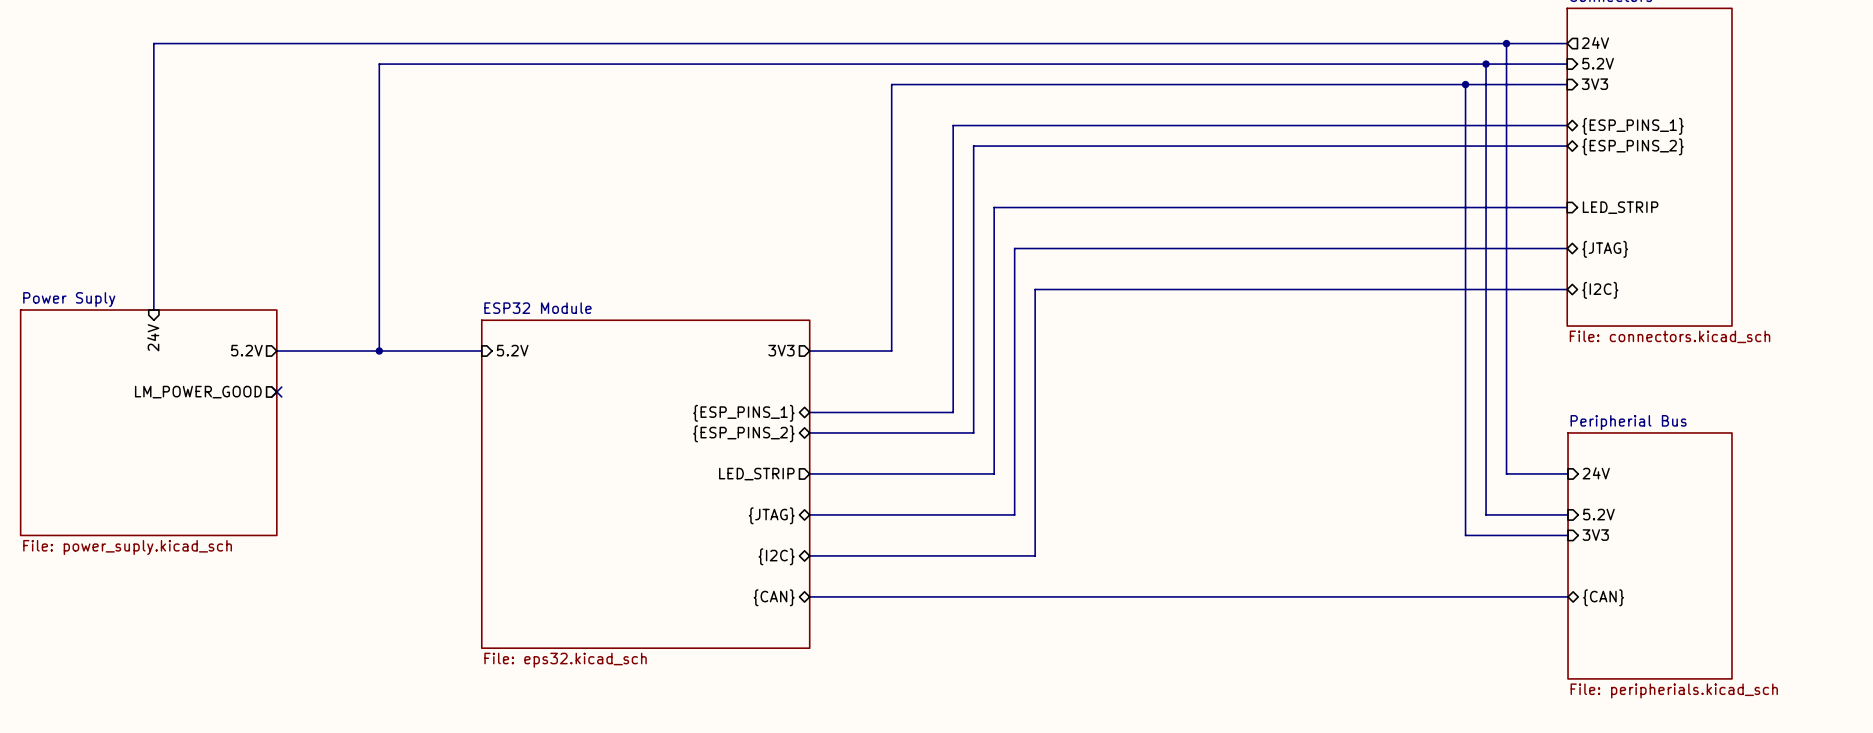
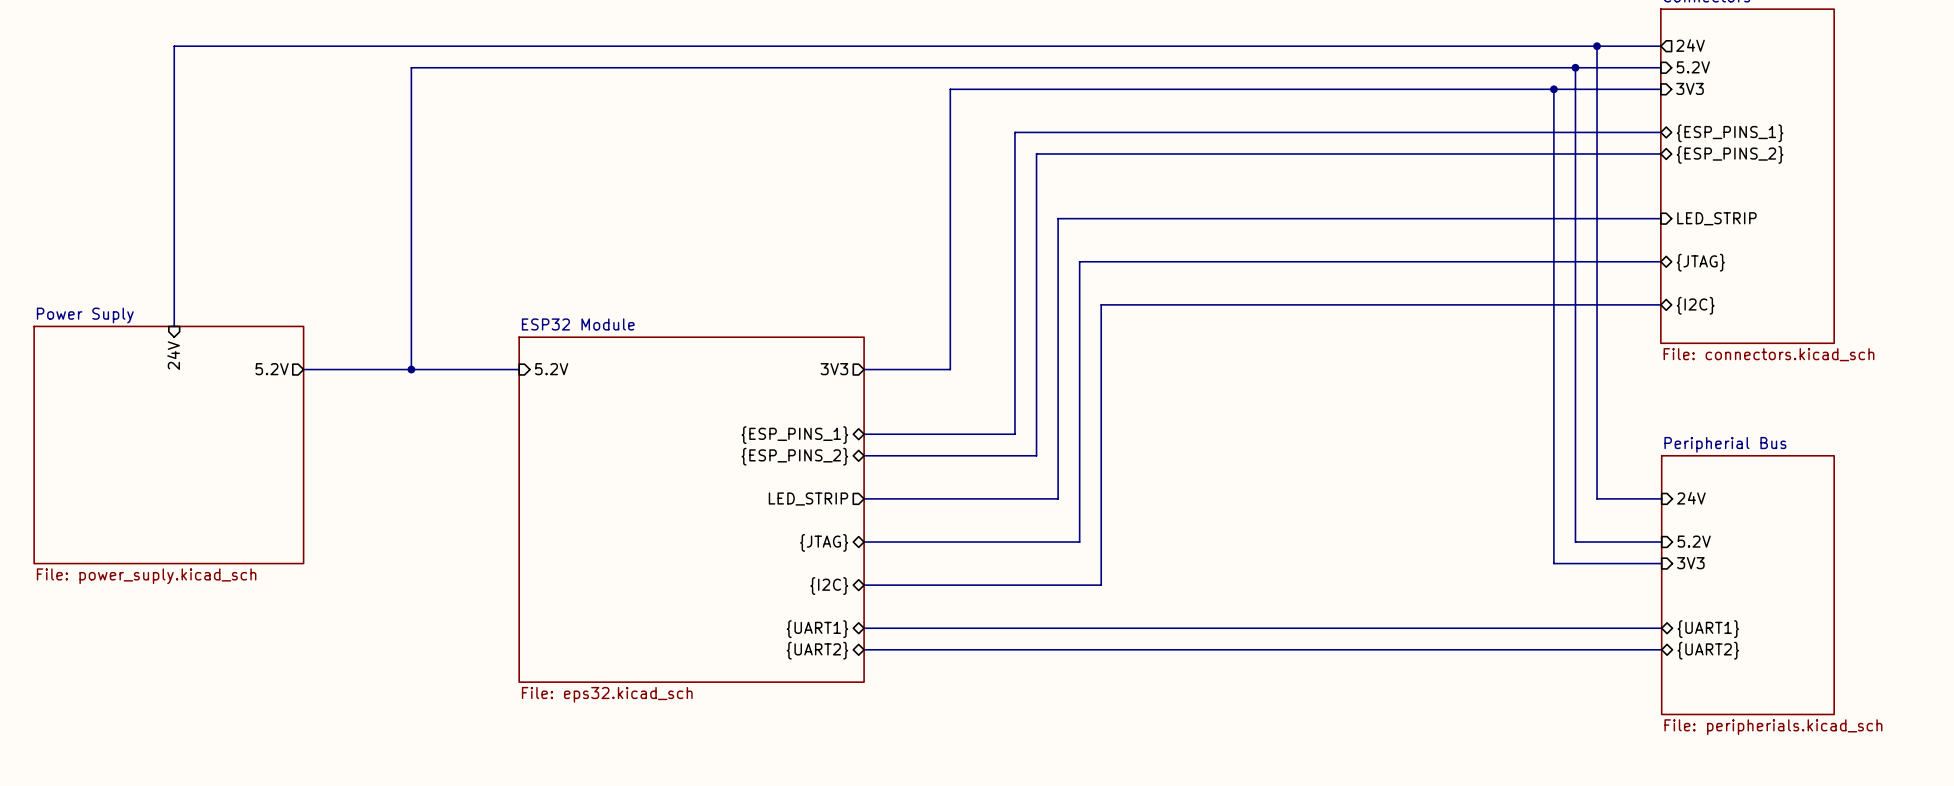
no-connect mark: (276, 391) -> none
sheet pin: LM_POWER_GOOD (198, 392) -> none
sheet pin: {CAN} (774, 597) -> {UART1} (817, 629)
sheet pin: {CAN} (1603, 597) -> {UART1} (1708, 629)
bus: none -> (864, 649) (1661, 649)
sheet pin: none -> {UART2} (817, 650)
sheet pin: none -> {UART2} (1708, 650)

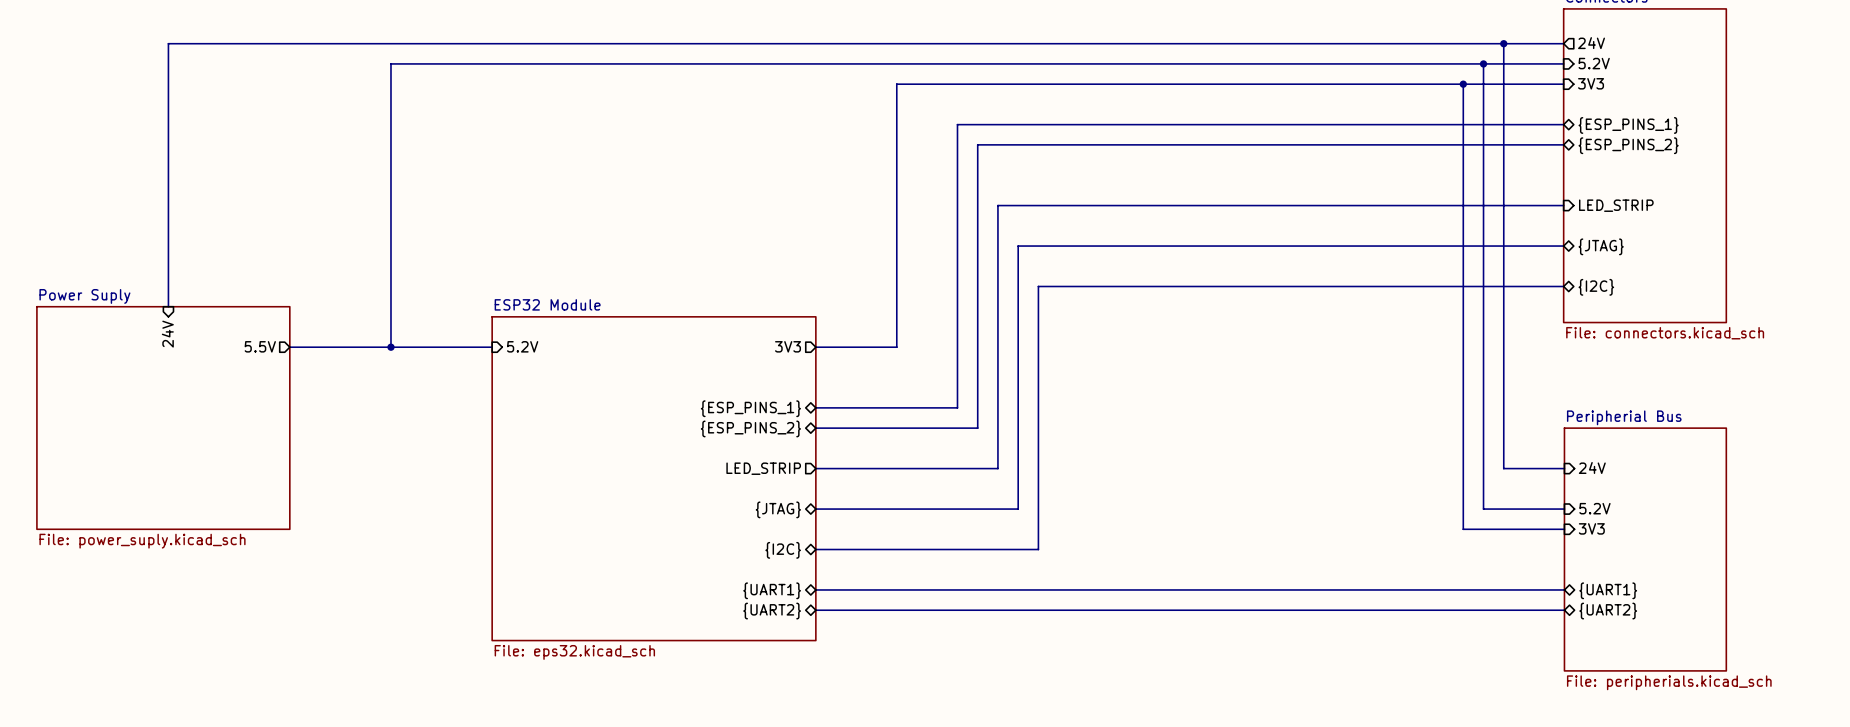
sheet pin: 5.2V (272, 369) -> 5.5V (260, 346)

